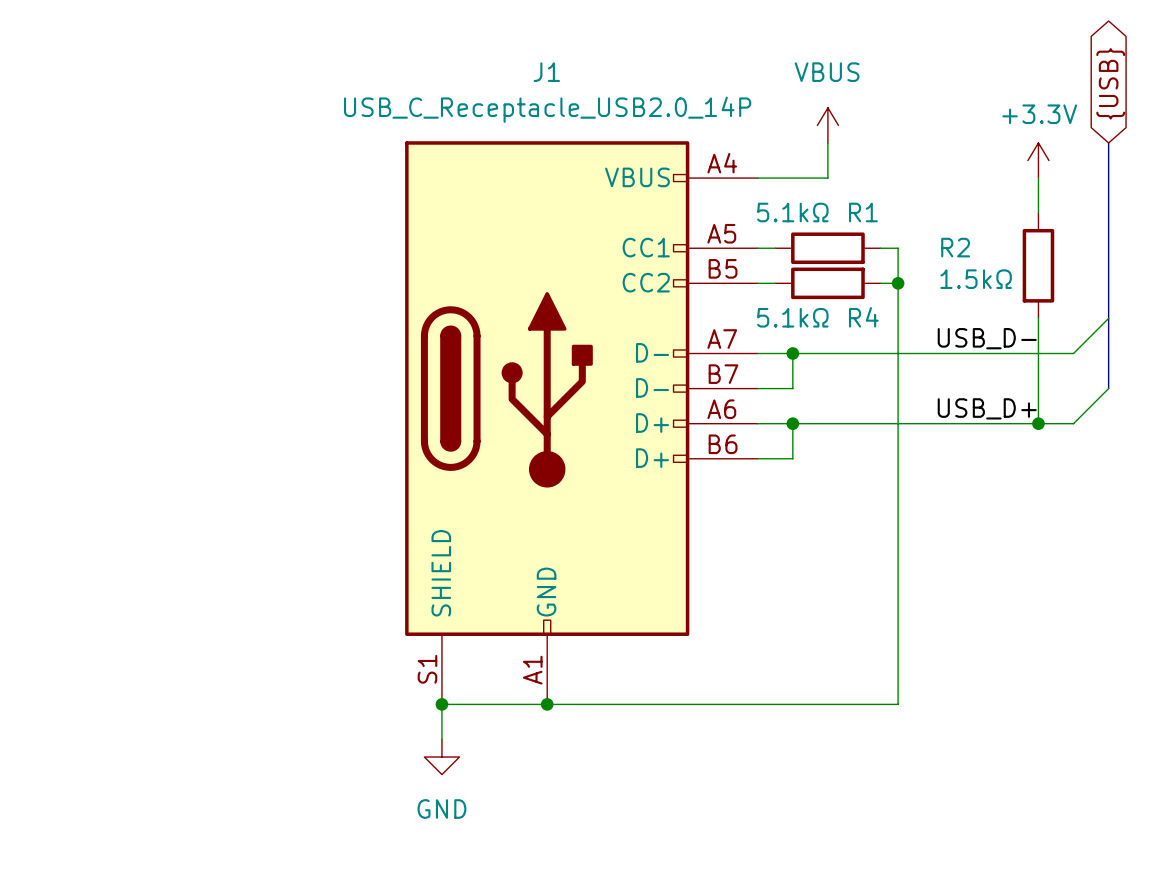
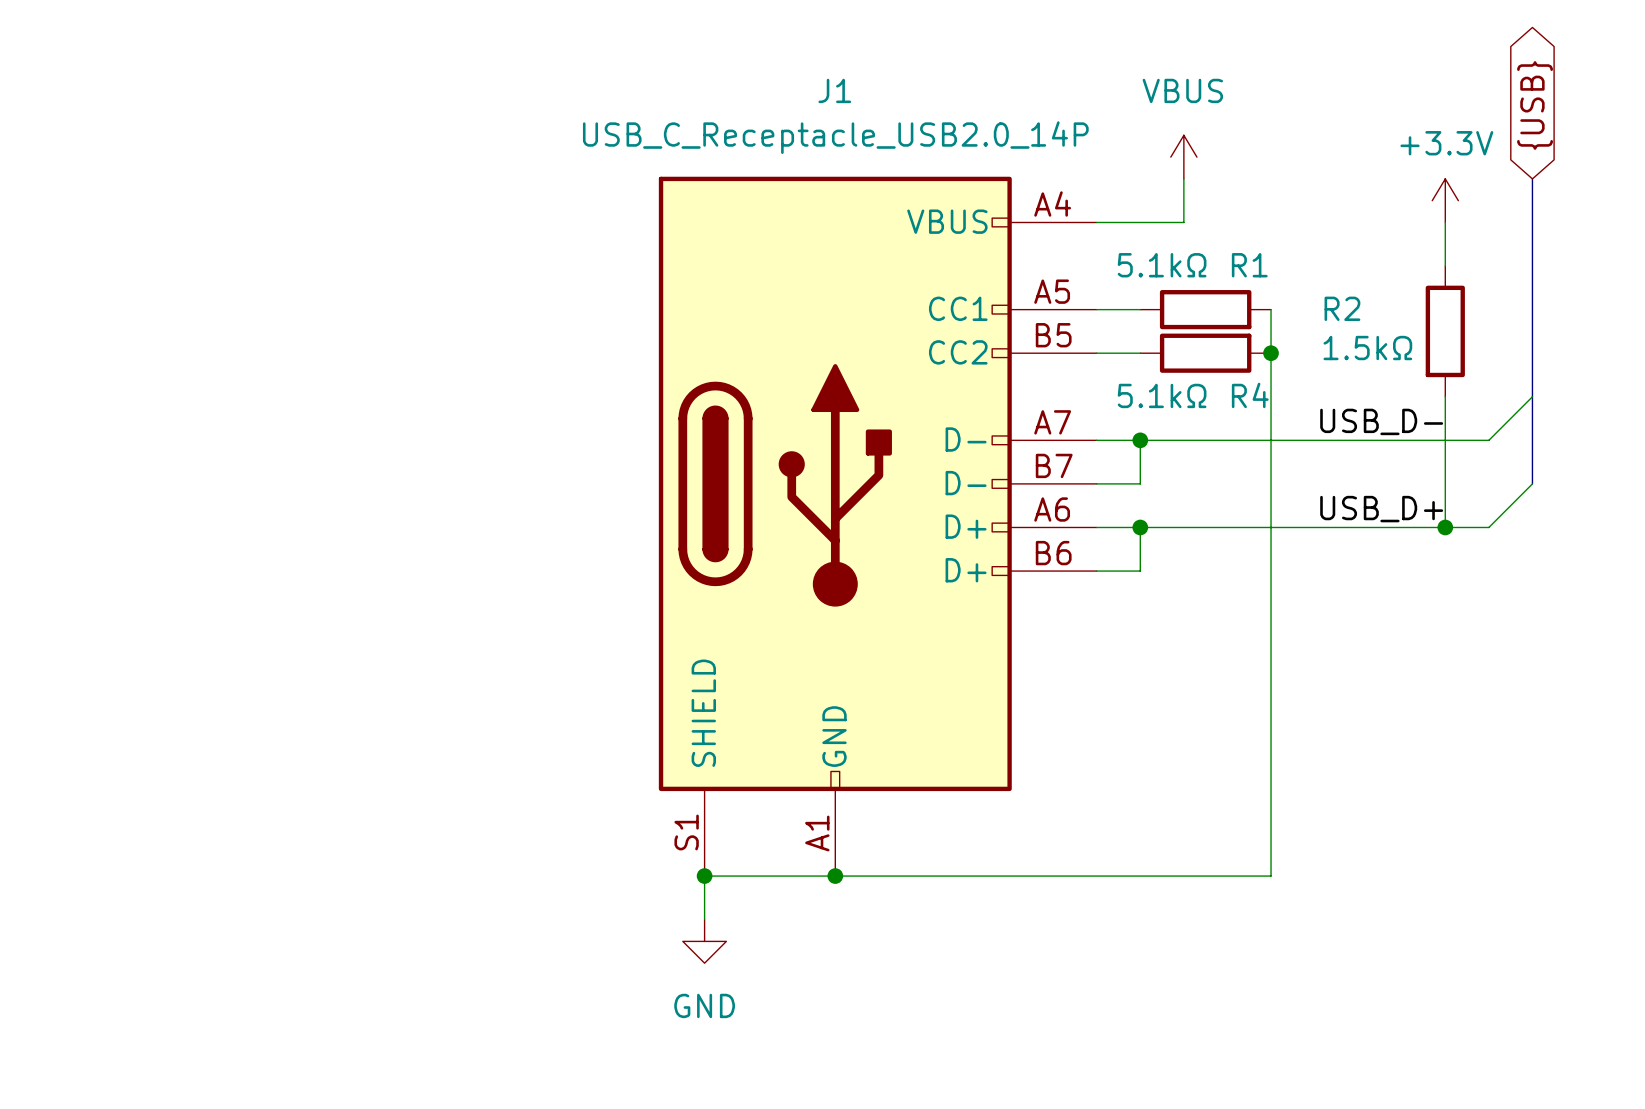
R1 position: (827, 248) -> (1205, 309)
R4 position: (827, 283) -> (1205, 353)

